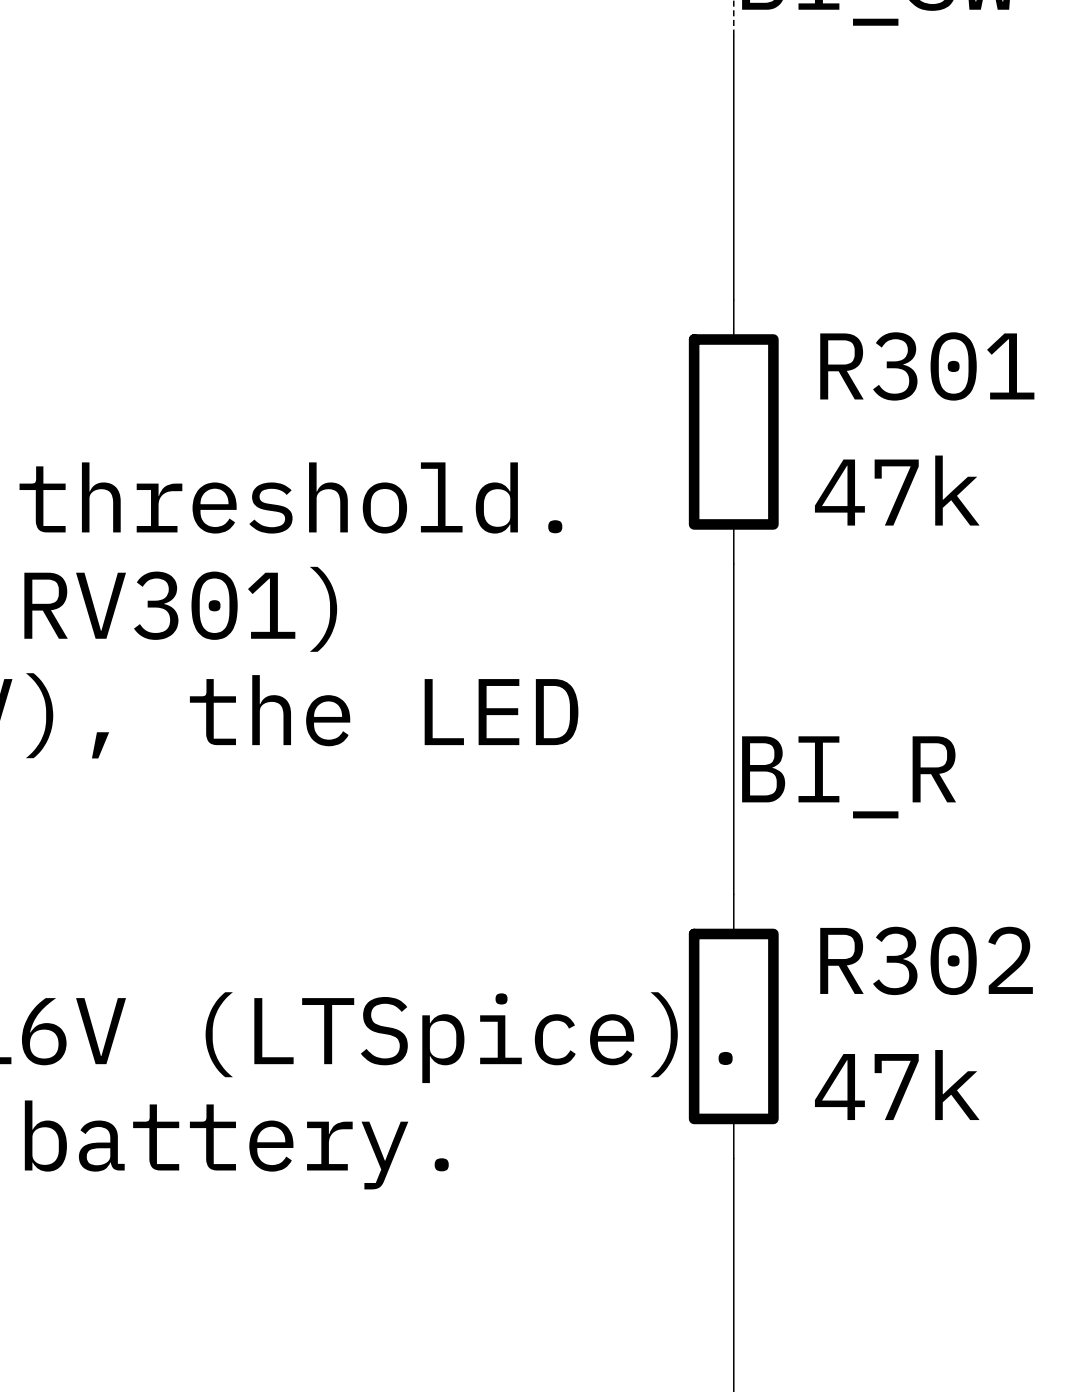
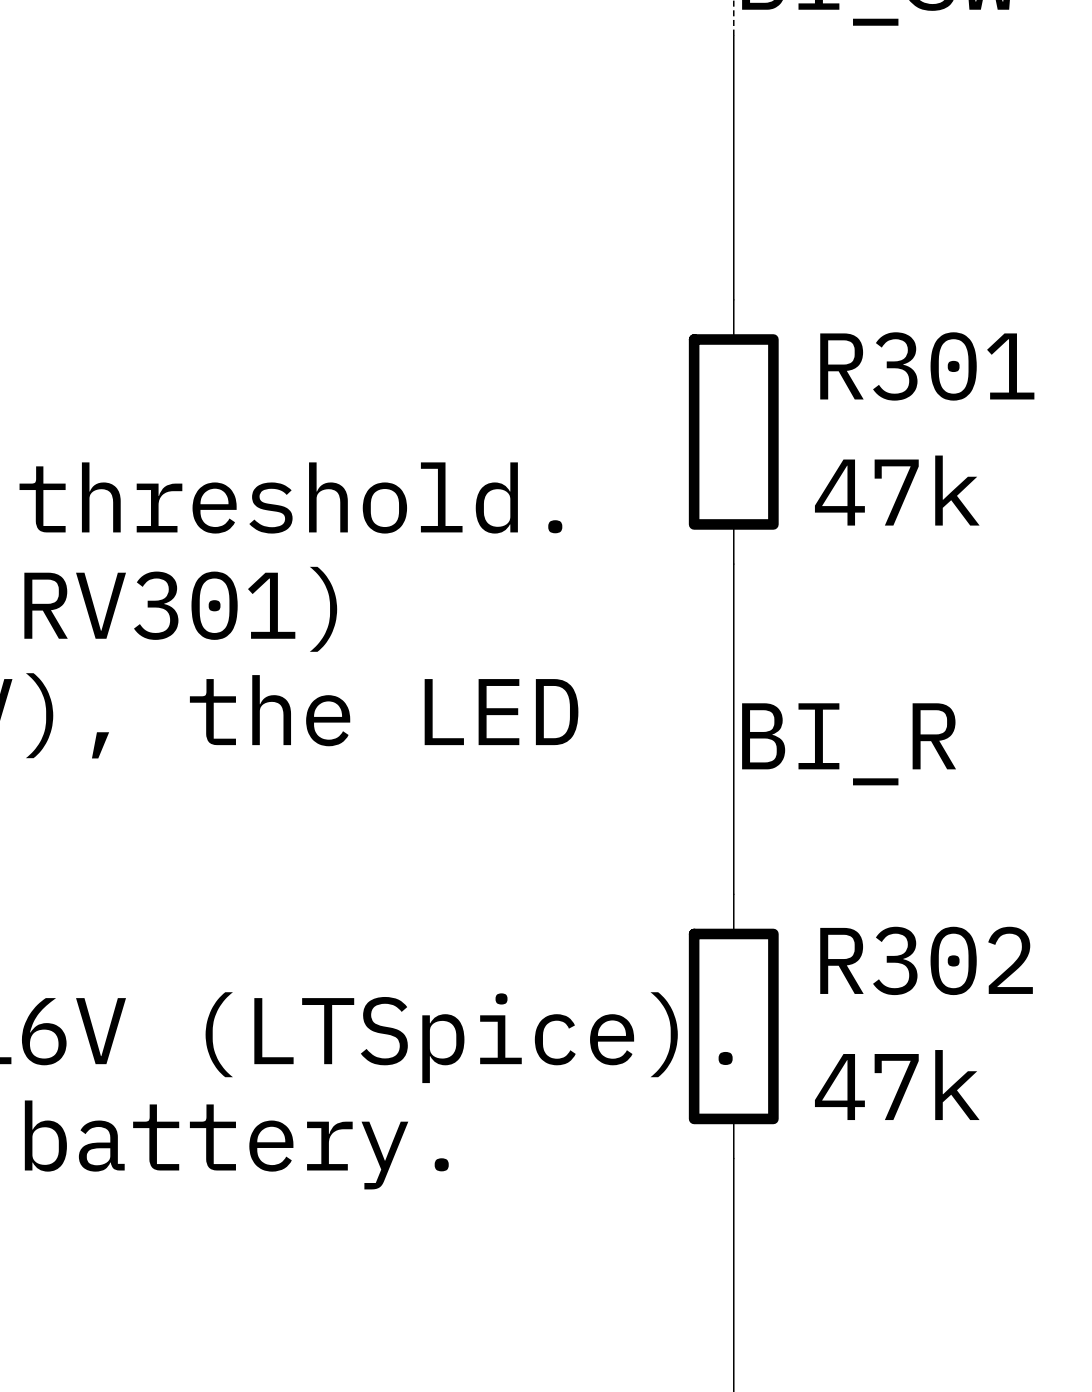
label position: BI_R (849, 777) -> BI_R (849, 744)

